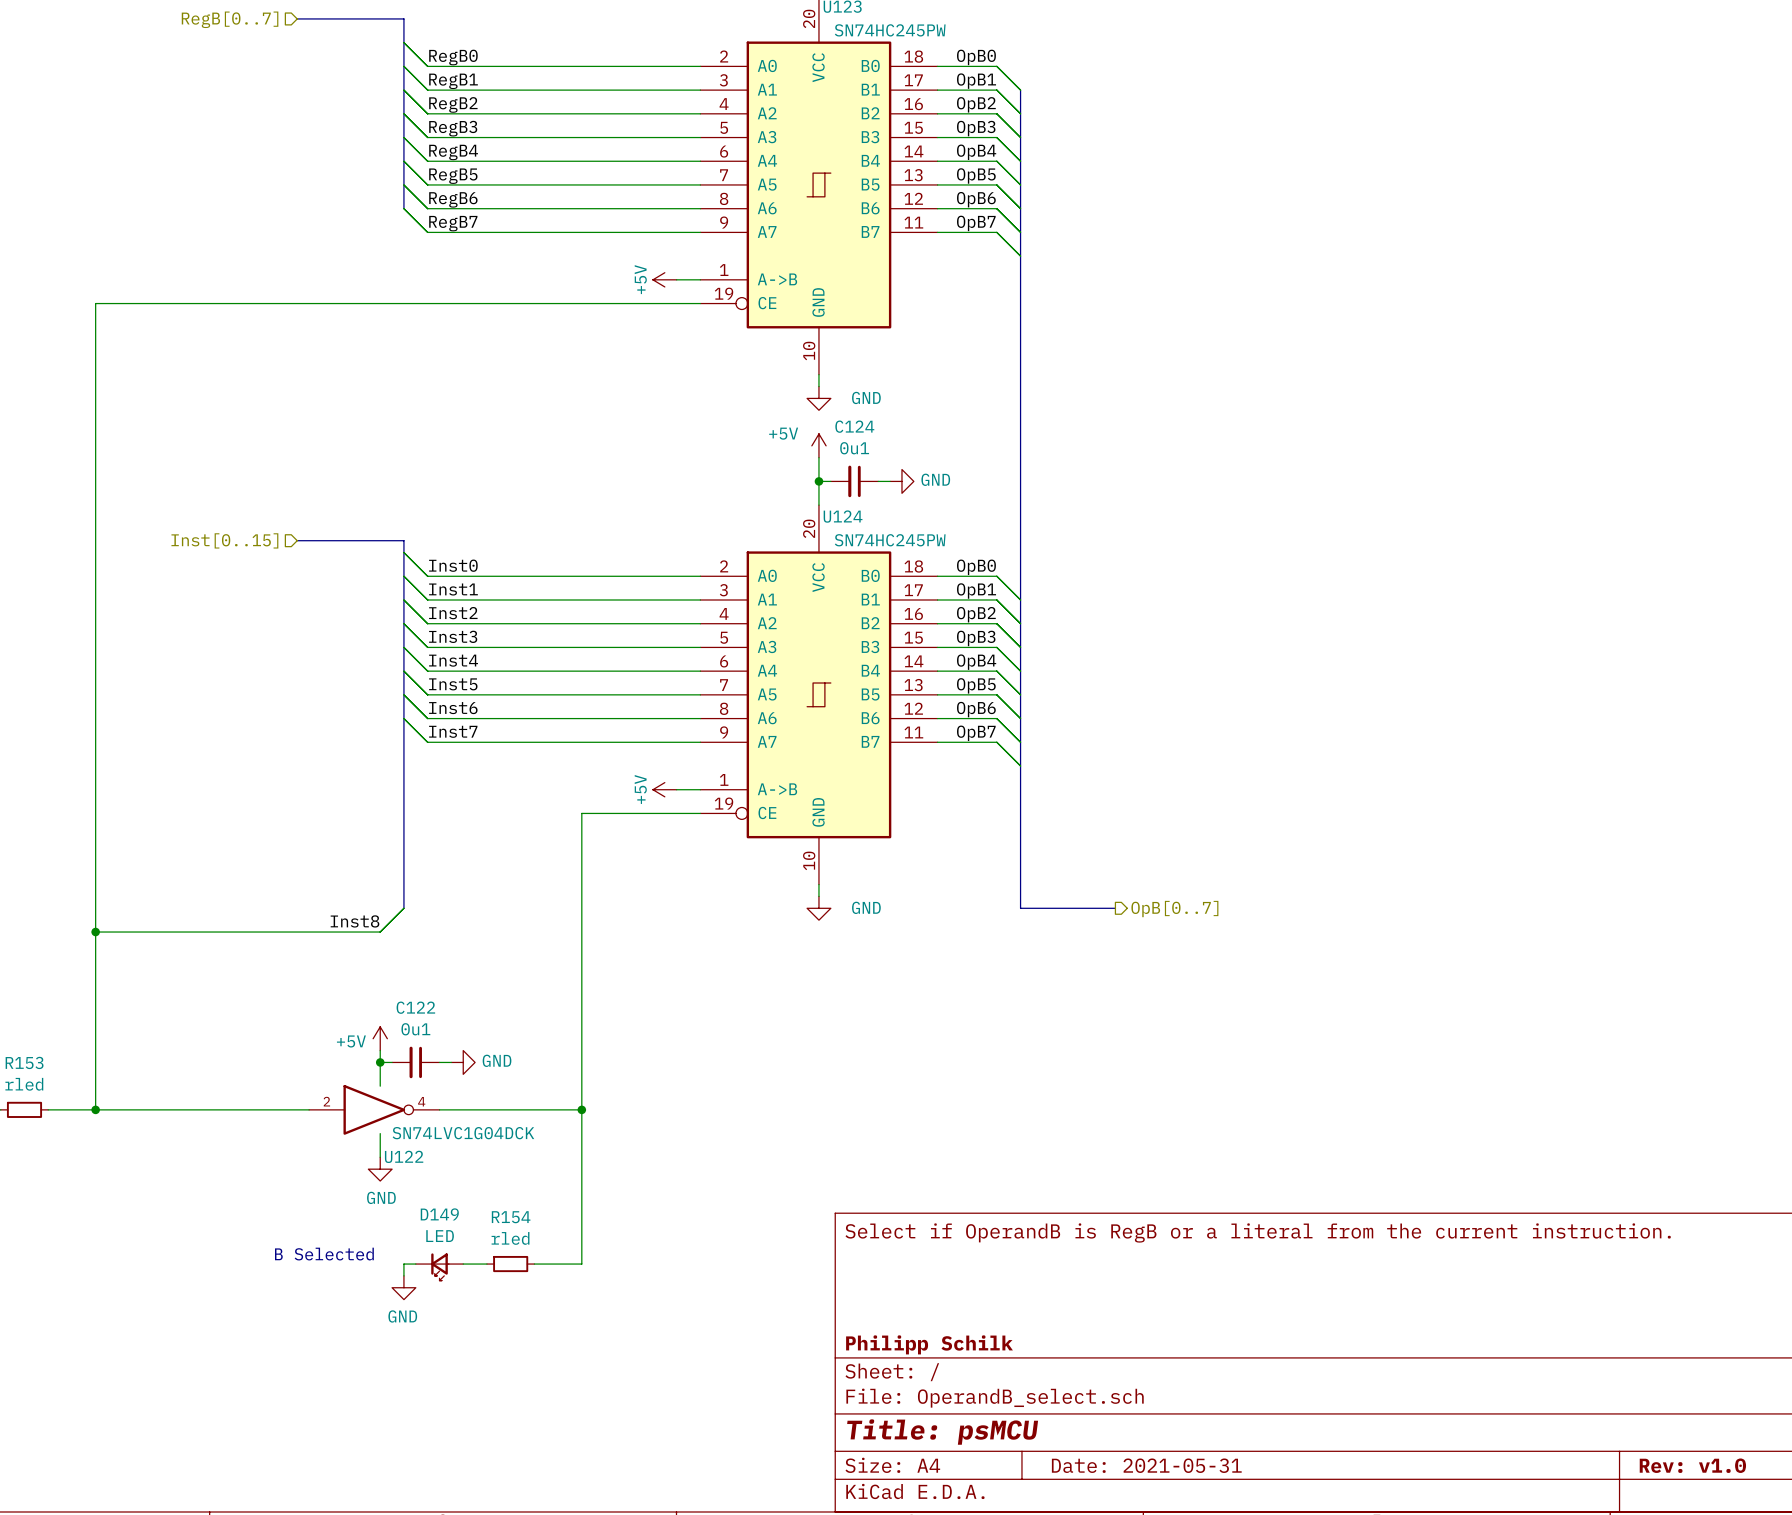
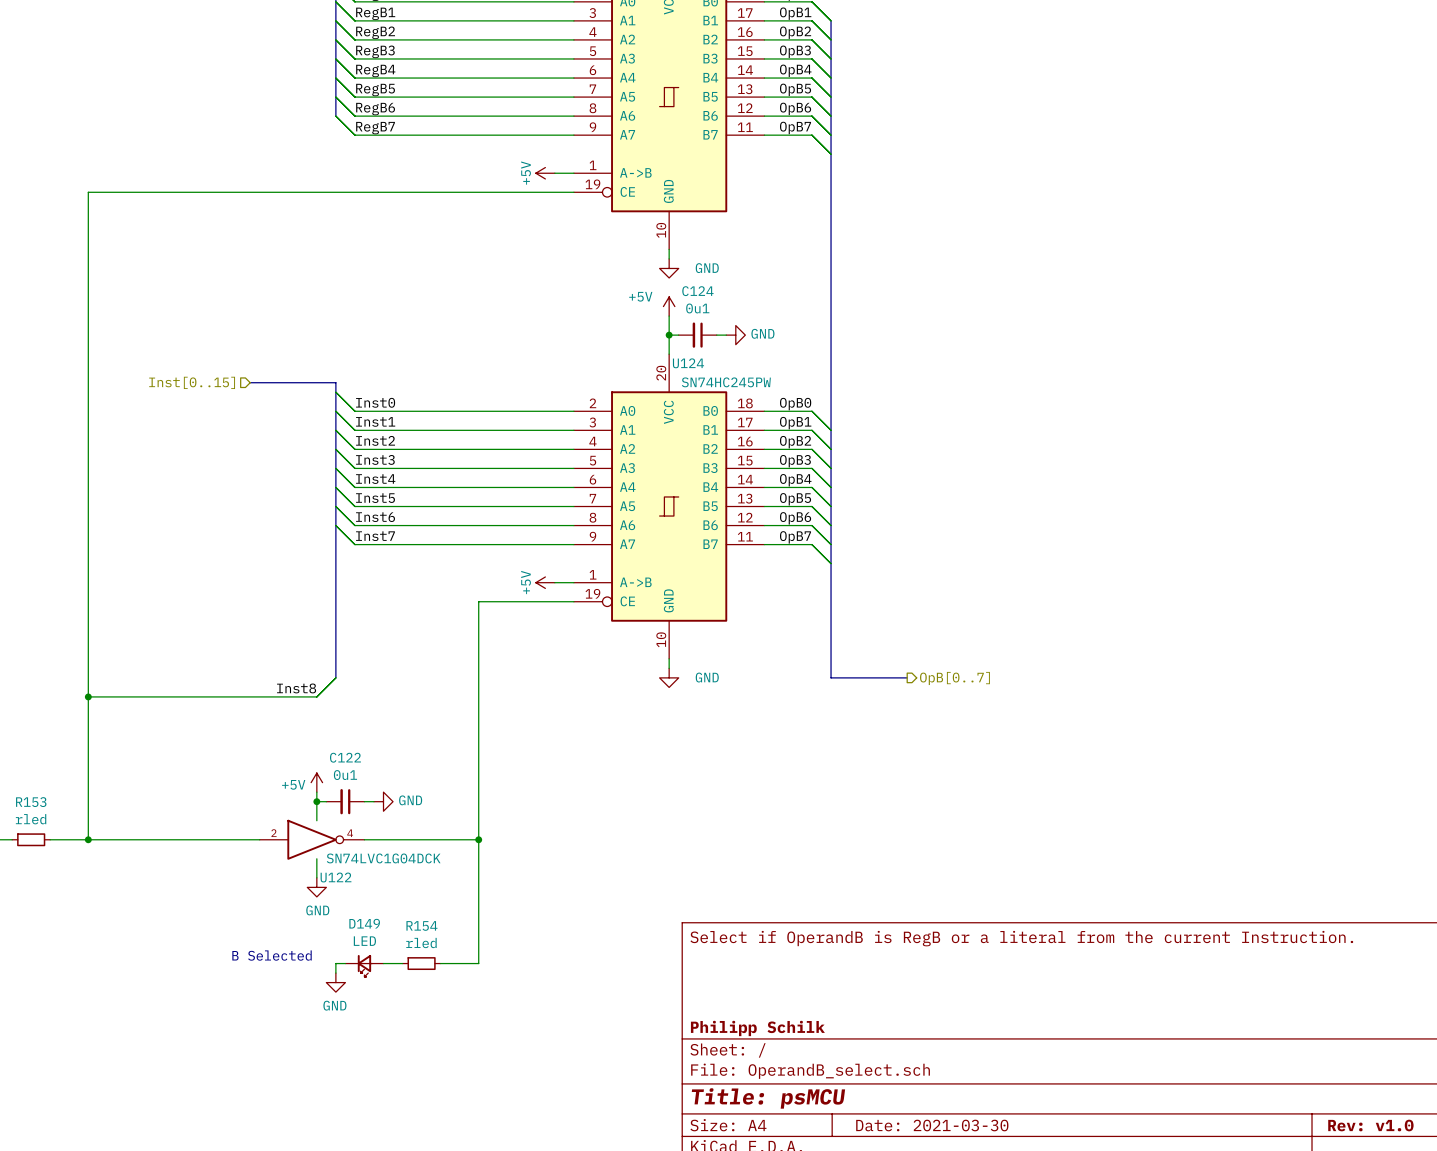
title block: Select if OperandB is RegB or a literal from the current instruction. (1258, 1232) -> Select if OperandB is RegB or a literal from the current Instruction. (1021, 938)
title block: Date: 2021-05-31 (1146, 1465) -> Date: 2021-03-30 (932, 1125)

